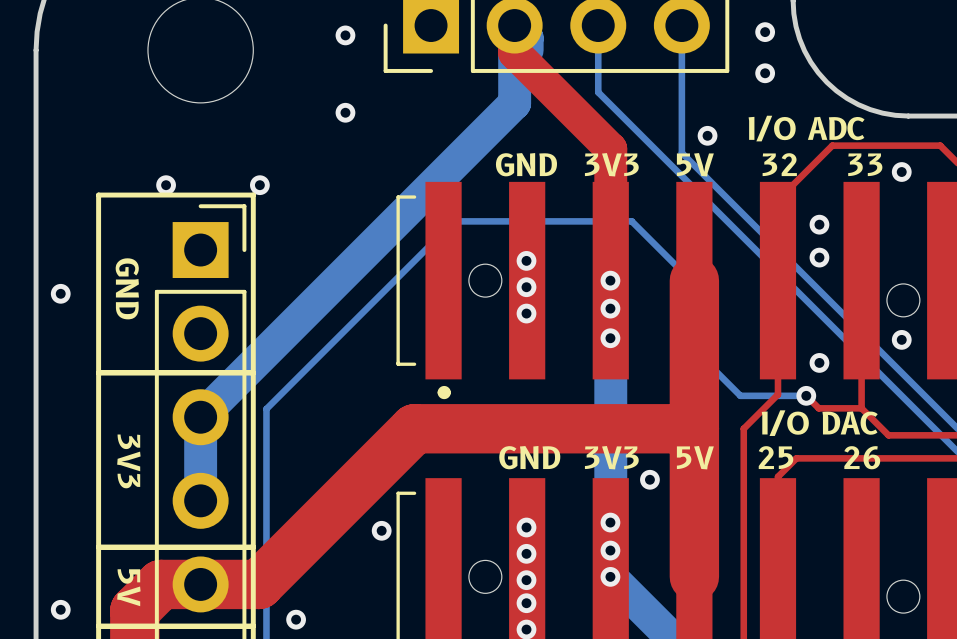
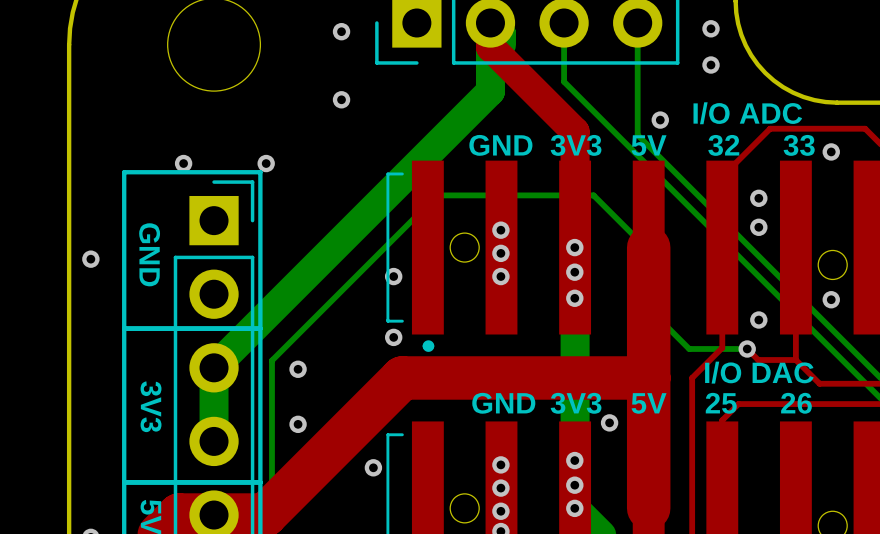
via: none -> (393, 276)
via: none -> (393, 337)
via: none -> (298, 369)
via: none -> (298, 424)

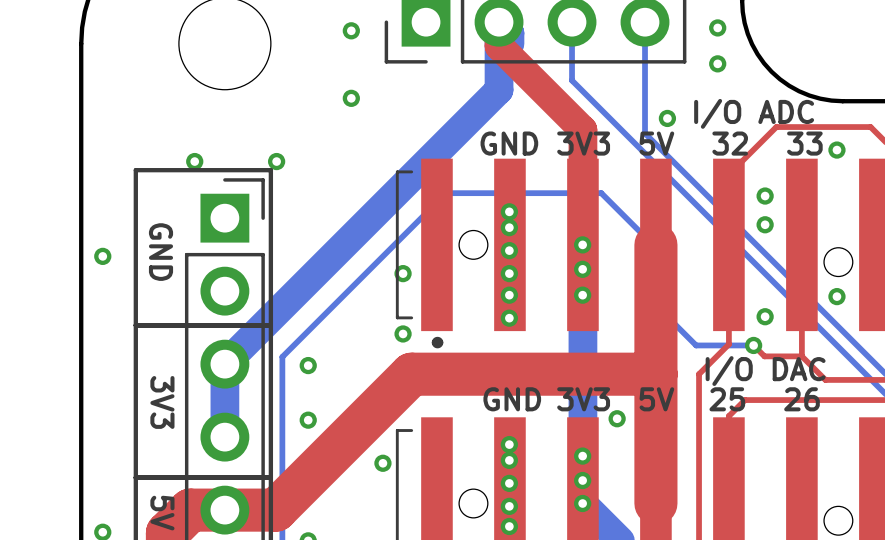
via: none -> (509, 211)
via: none -> (509, 295)
via: none -> (509, 318)
via: none -> (509, 444)

